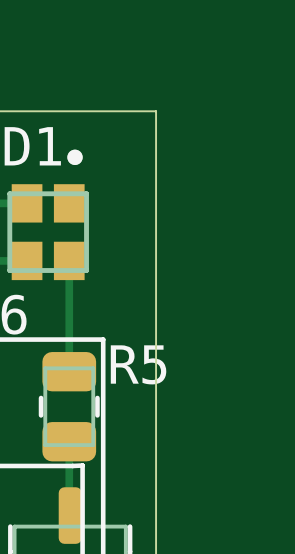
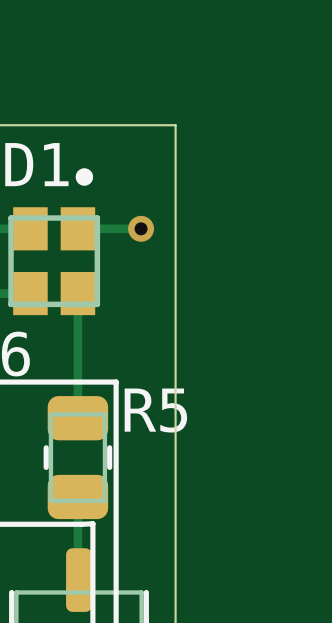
track: none -> (77, 228) (141, 228)
via: none -> (141, 228)

